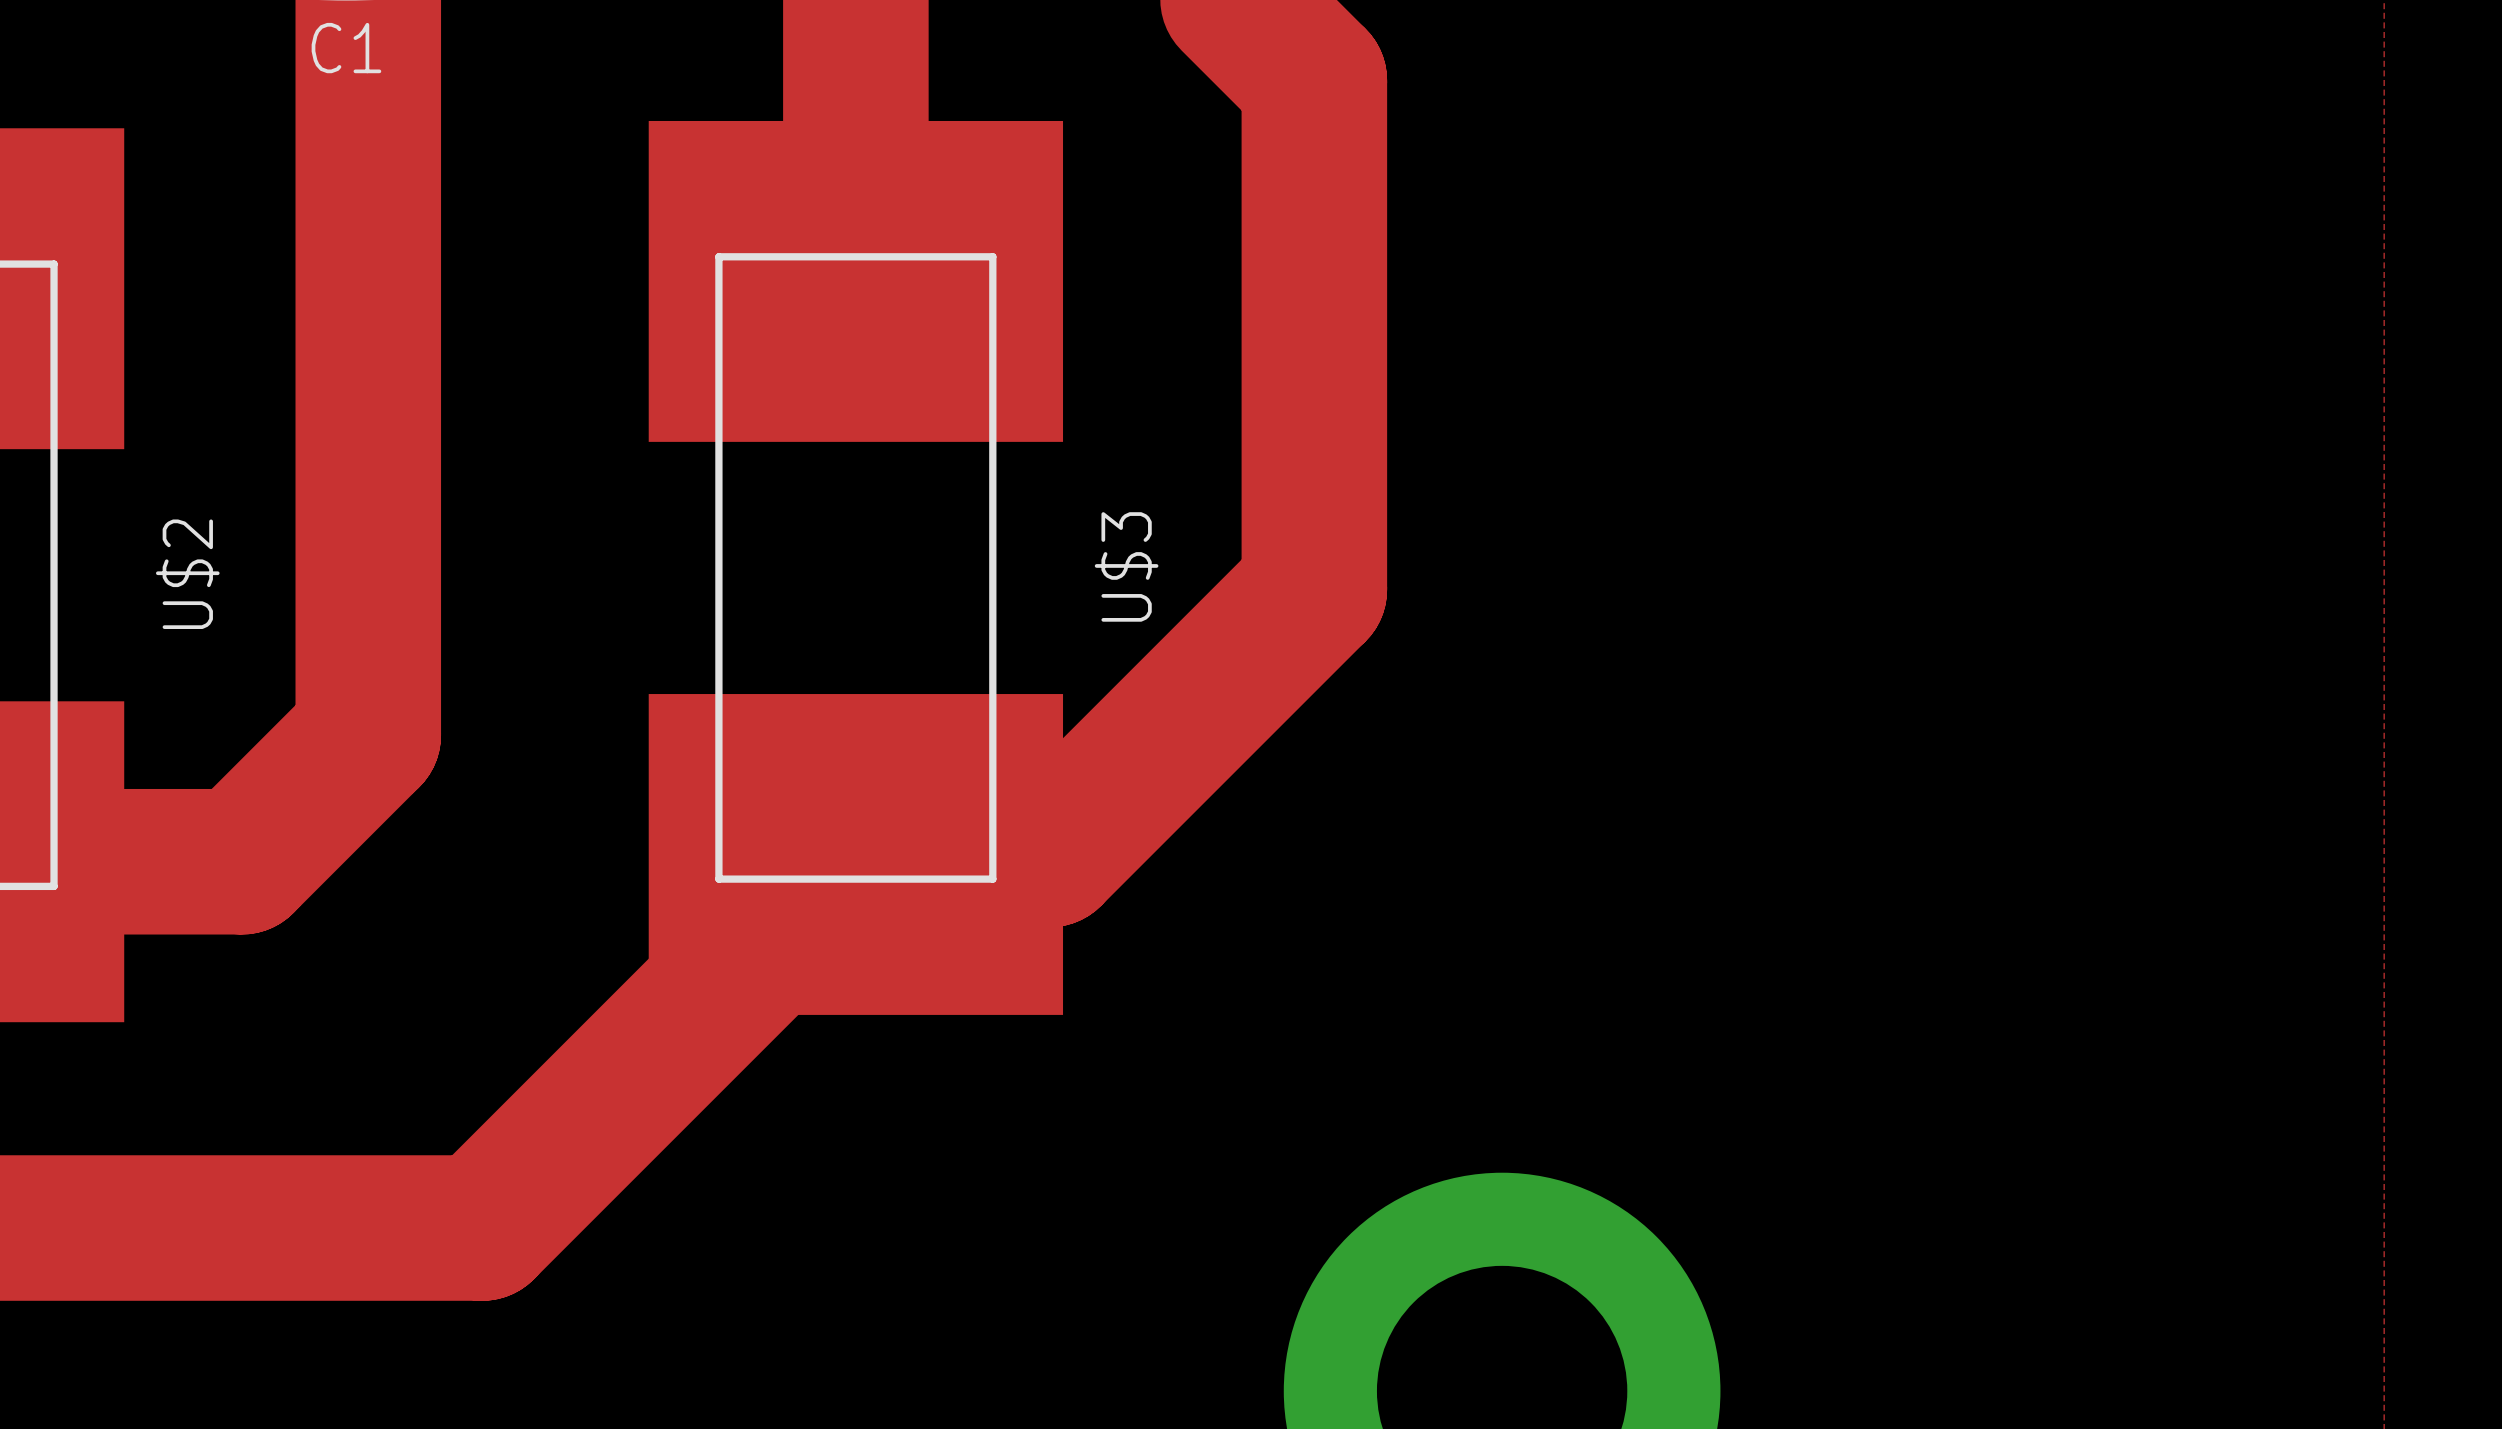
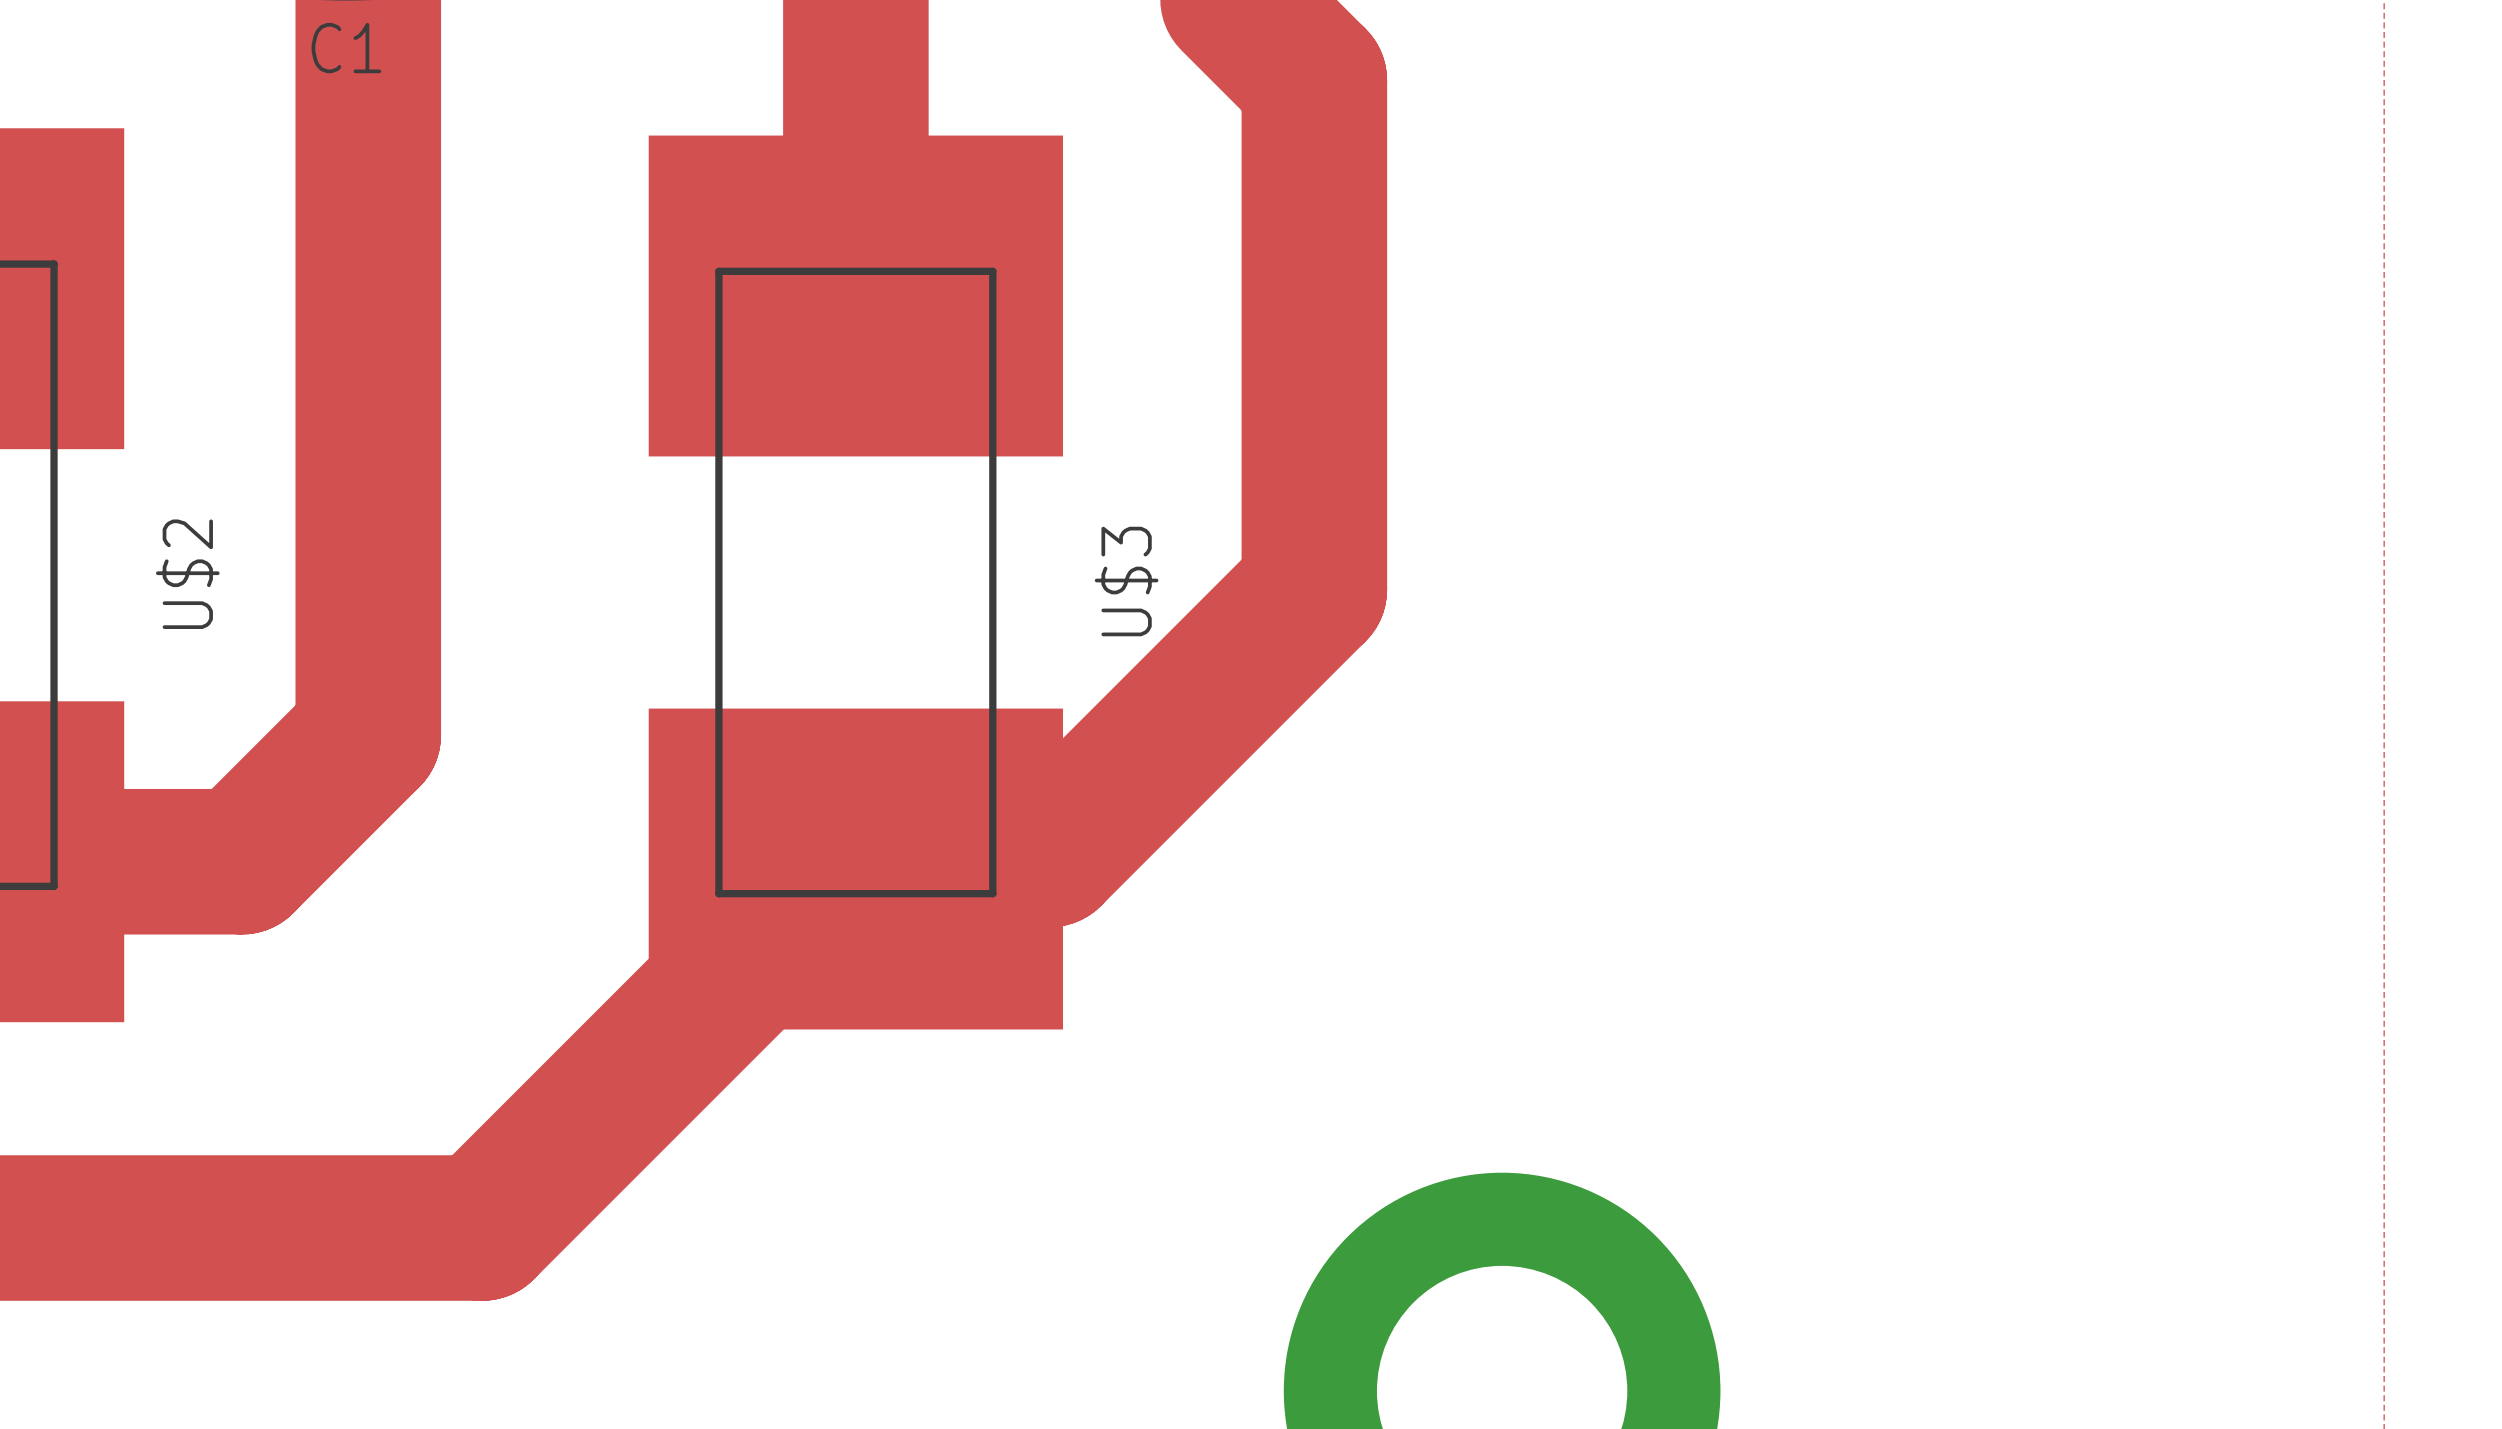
U$3 position: (855, 567) -> (855, 582)

